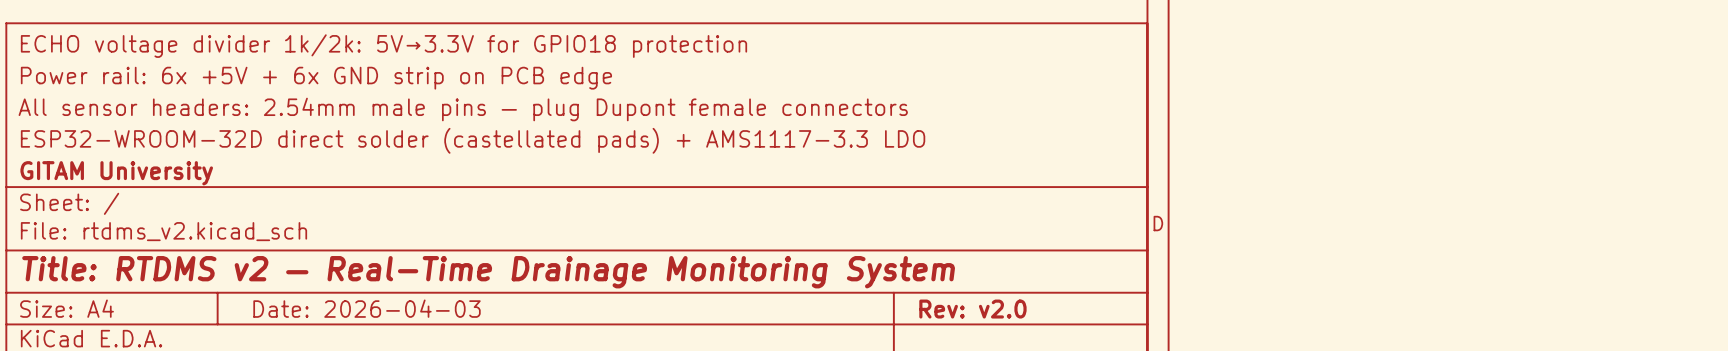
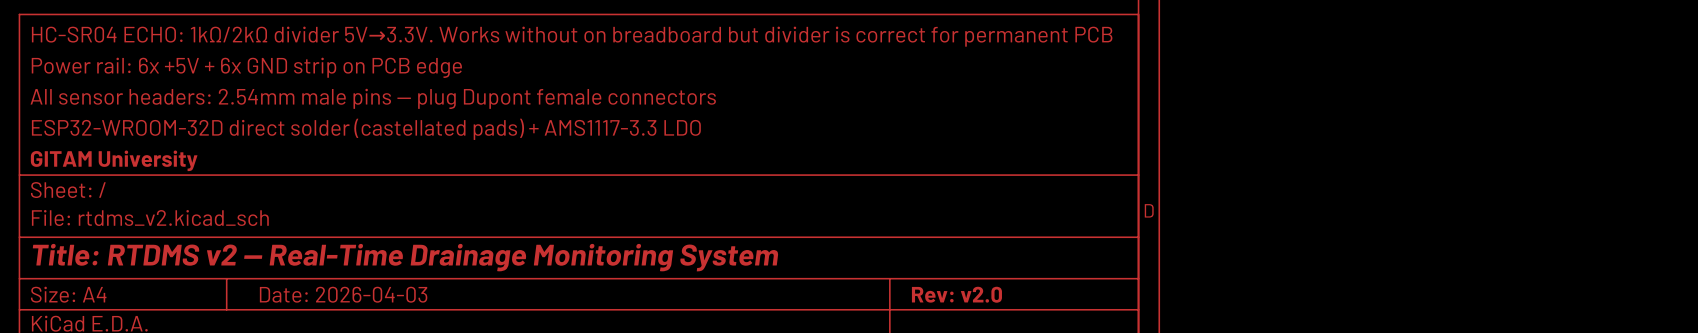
title block: ECHO voltage divider 1k/2k: 5V→3.3V for GPIO18 protection (383, 46) -> HC-SR04 ECHO: 1kΩ/2kΩ divider 5V→3.3V. Works without on breadboard but divider is correct for permanent PCB (572, 36)

